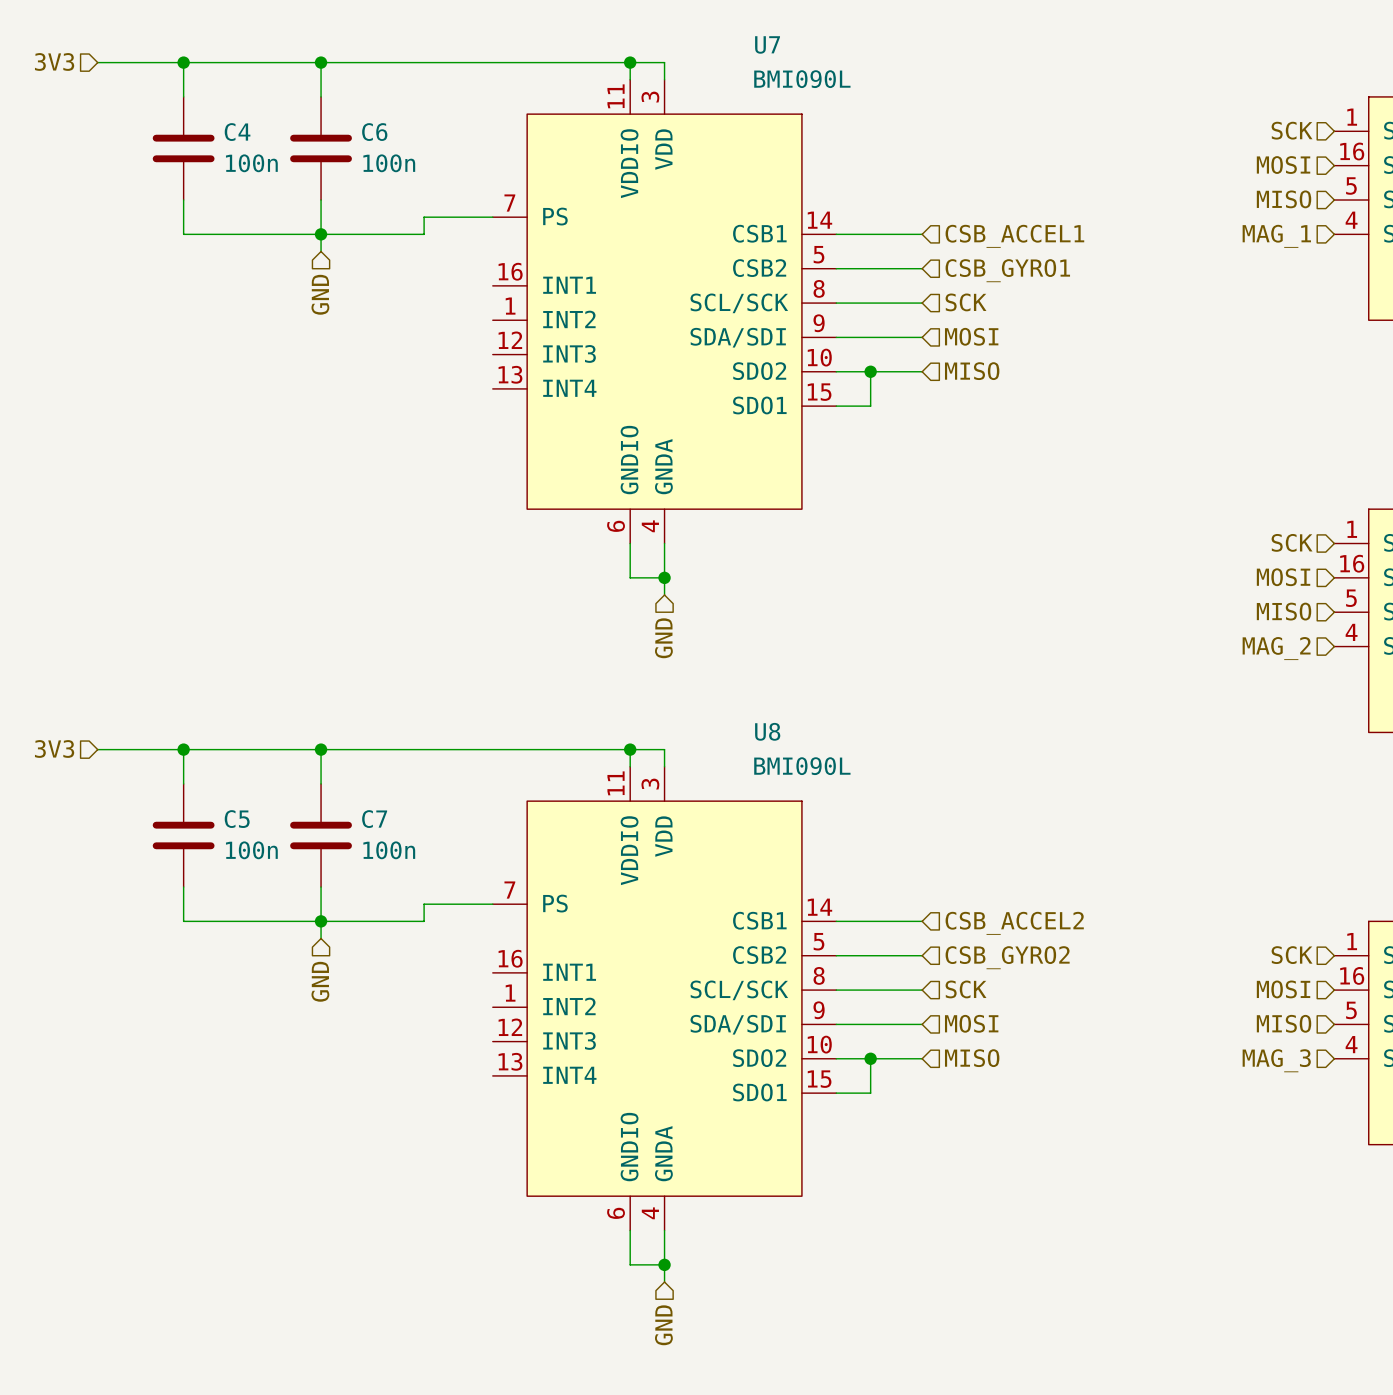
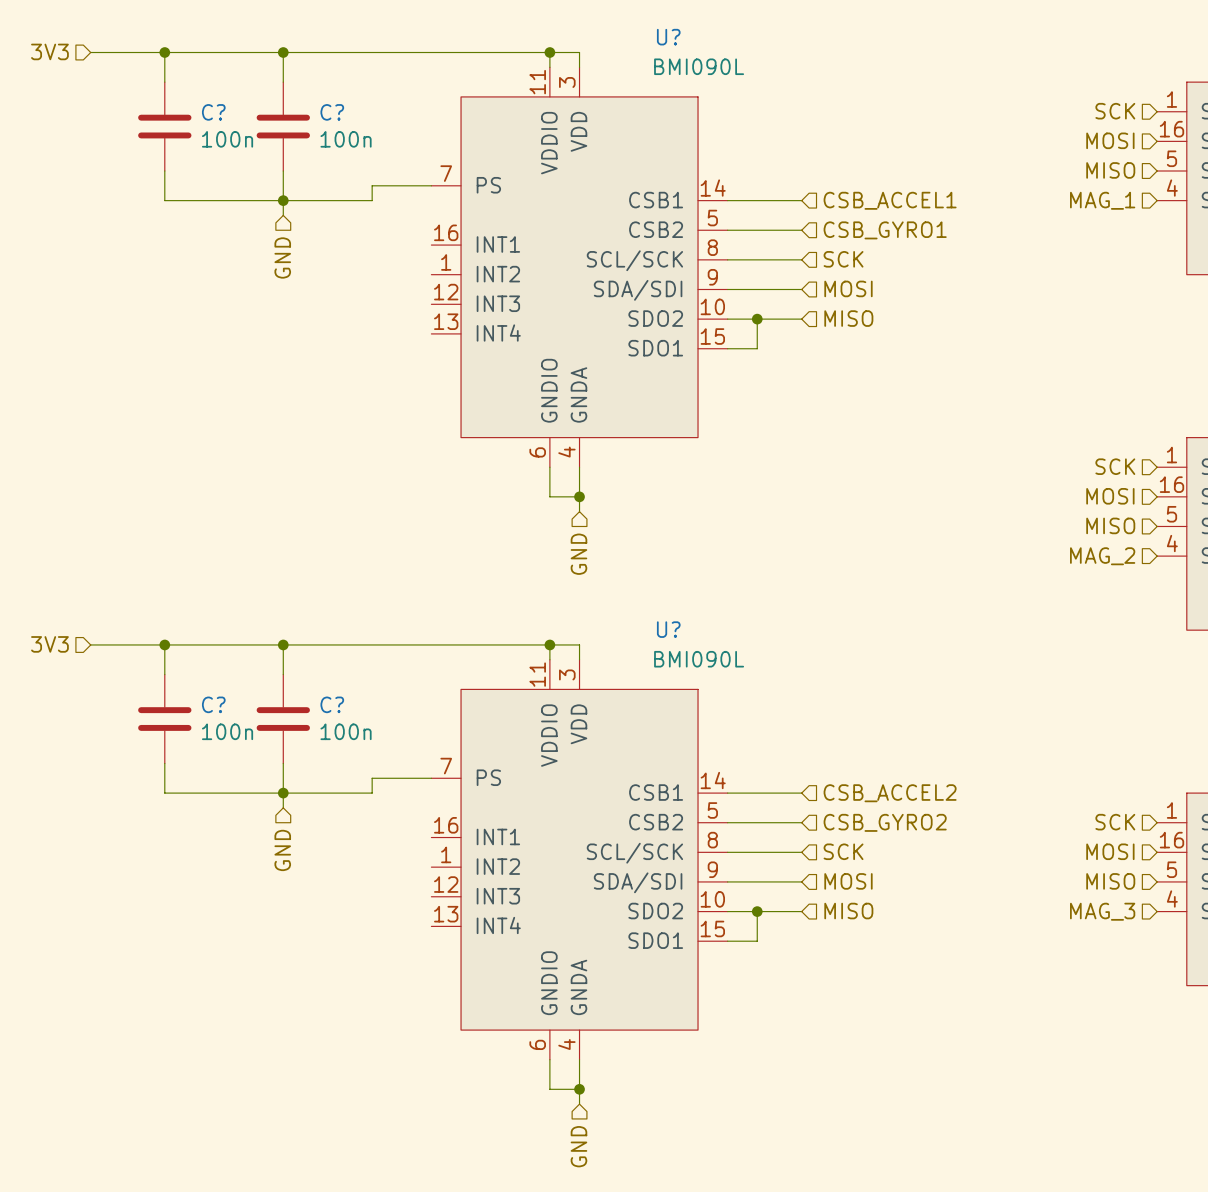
U7 name: U7 (767, 44) -> U? (668, 37)
C4 name: C4 (237, 132) -> C? (213, 112)
C6 name: C6 (374, 132) -> C? (332, 112)
U8 name: U8 (767, 731) -> U? (668, 629)
C5 name: C5 (237, 819) -> C? (213, 704)
C7 name: C7 (374, 819) -> C? (332, 704)

